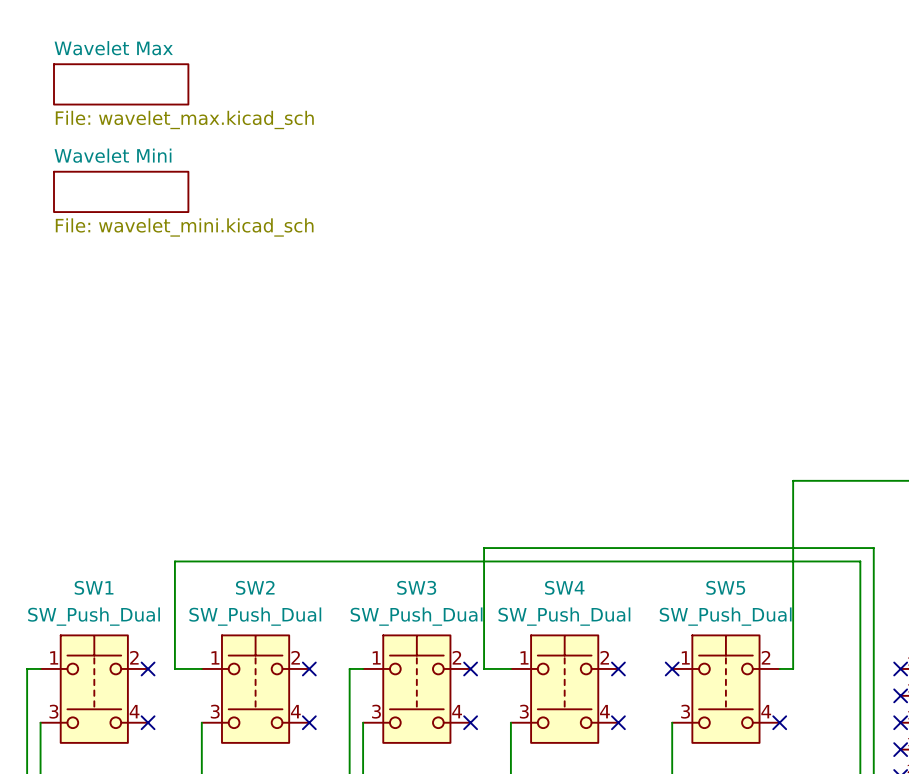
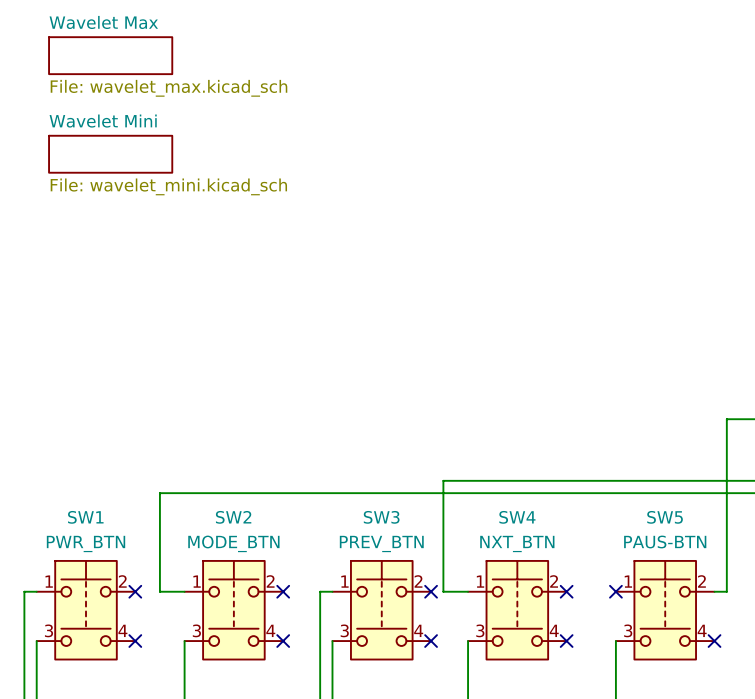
SW1 value: SW_Push_Dual (94, 616) -> PWR_BTN (86, 543)
SW2 value: SW_Push_Dual (255, 616) -> MODE_BTN (233, 543)
SW3 value: SW_Push_Dual (416, 616) -> PREV_BTN (381, 543)
SW4 value: SW_Push_Dual (564, 616) -> NXT_BTN (517, 543)
SW5 value: SW_Push_Dual (725, 616) -> PAUS-BTN (665, 542)

